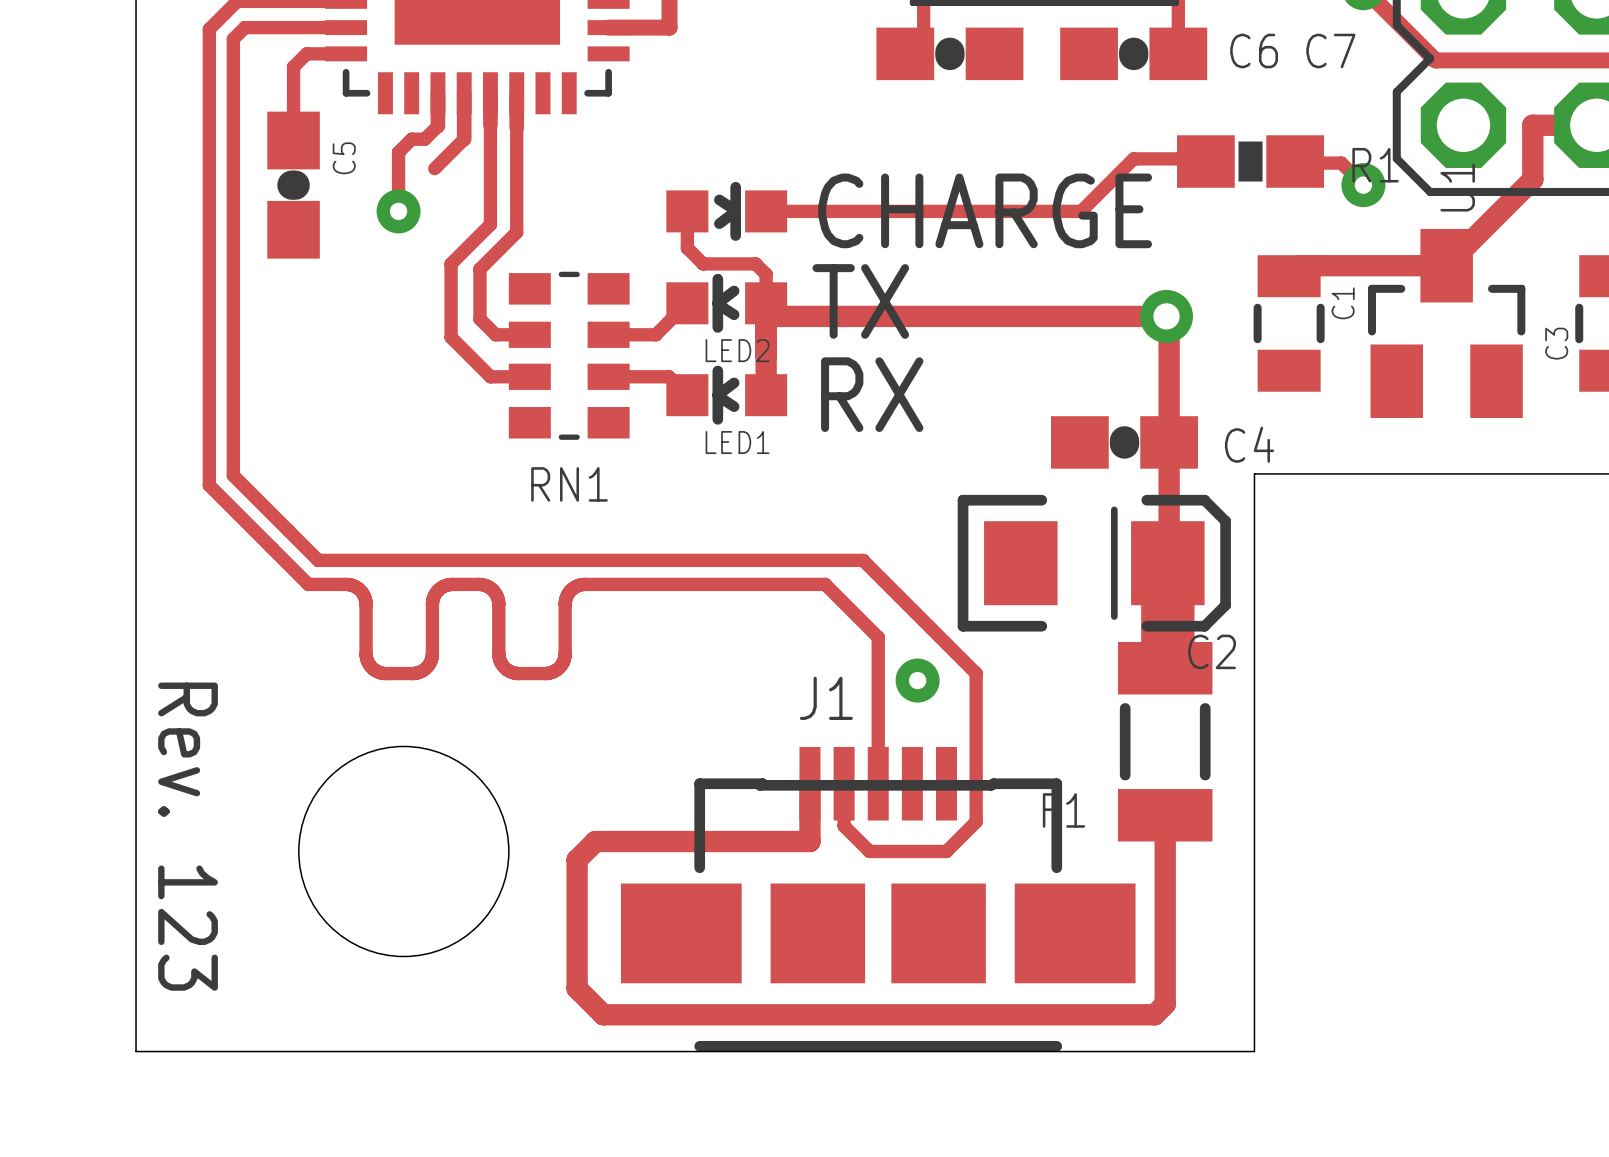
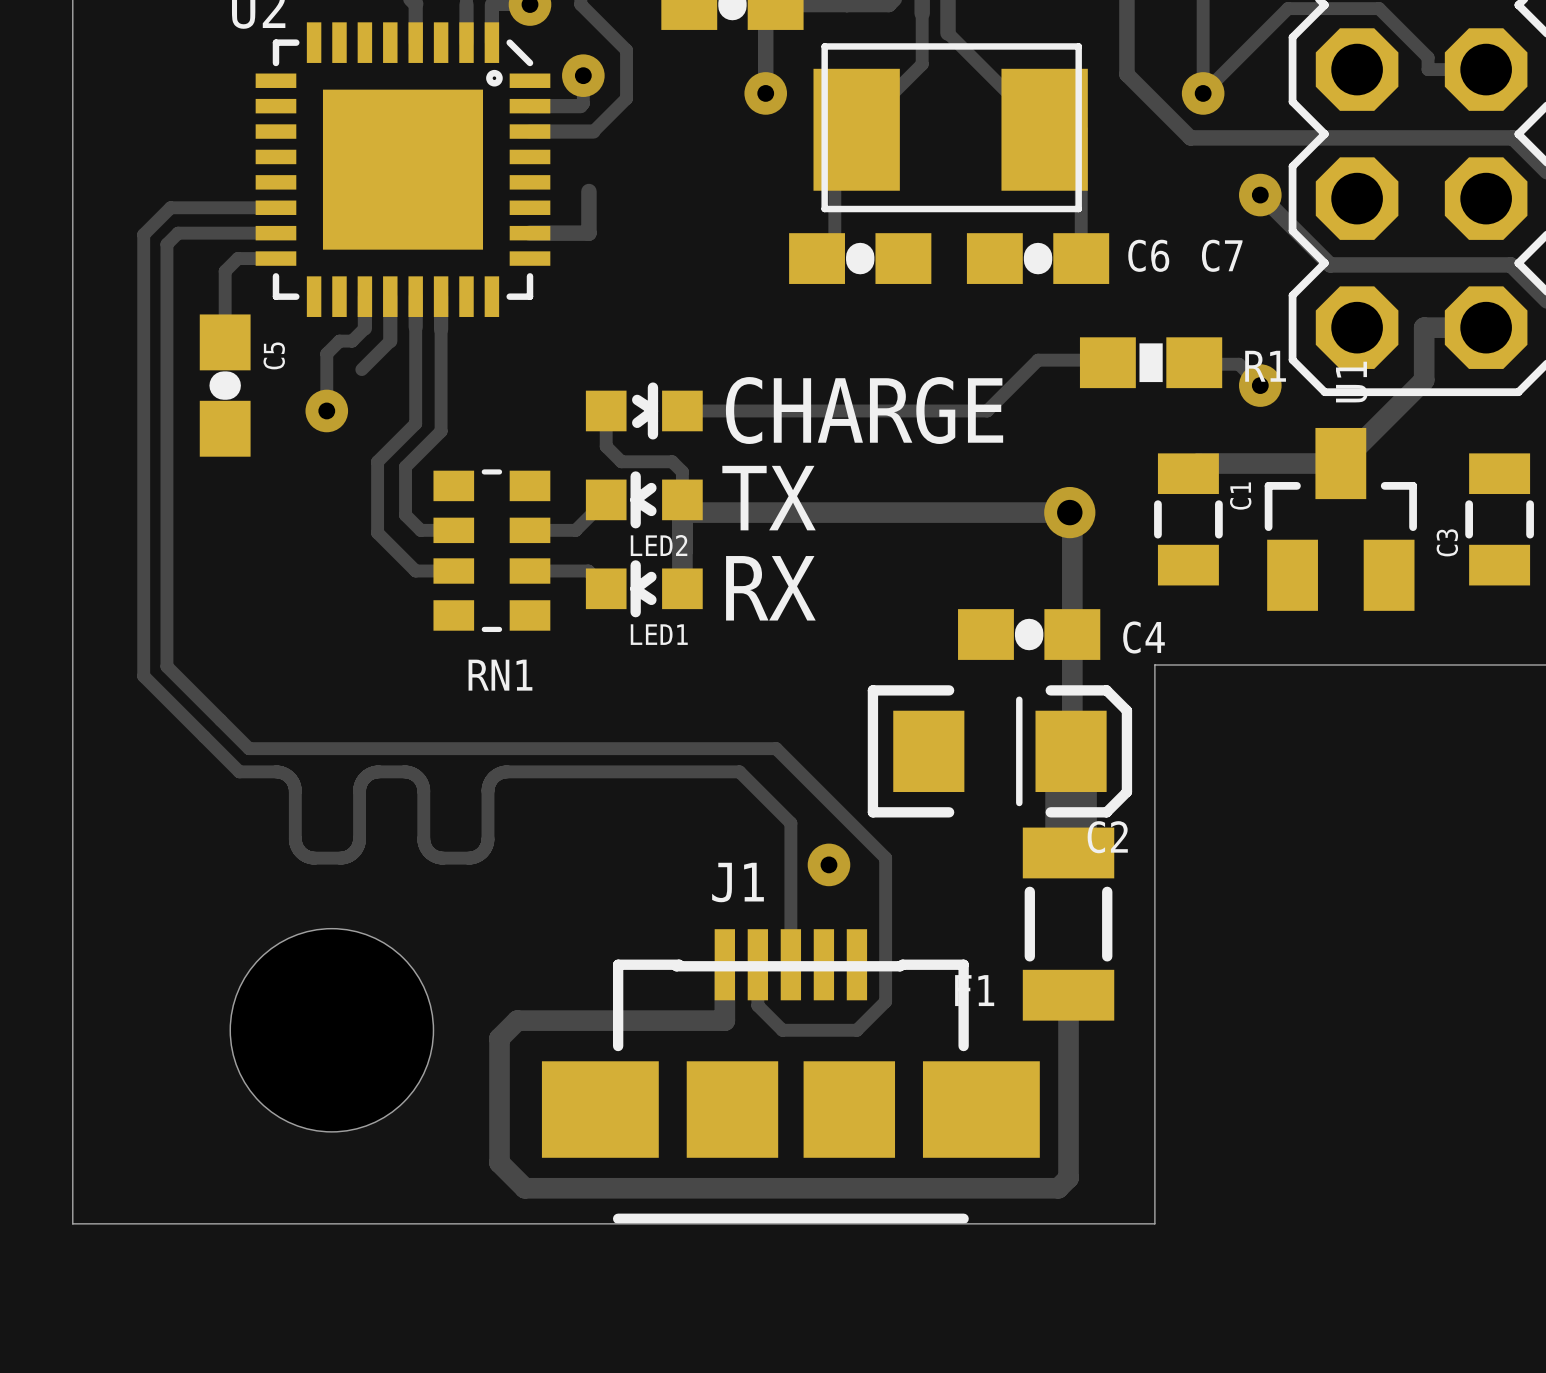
text: Rev. 123 (188, 836) -> none

